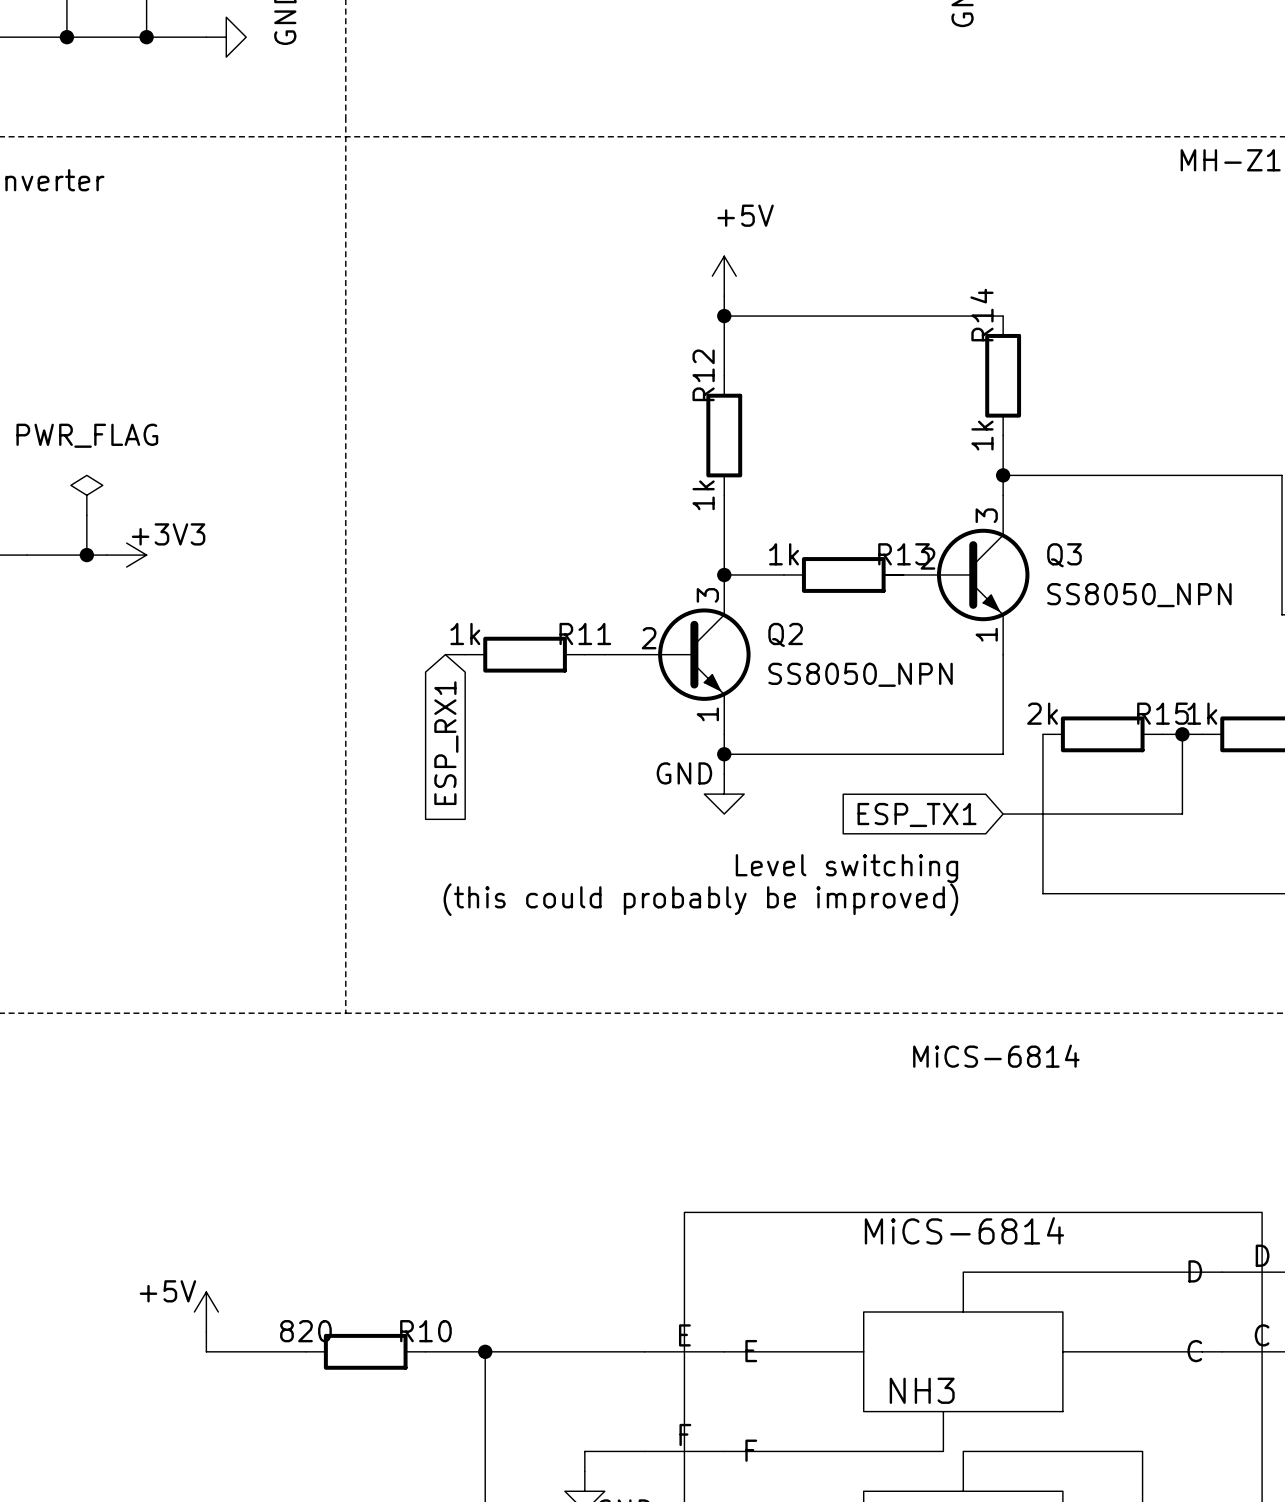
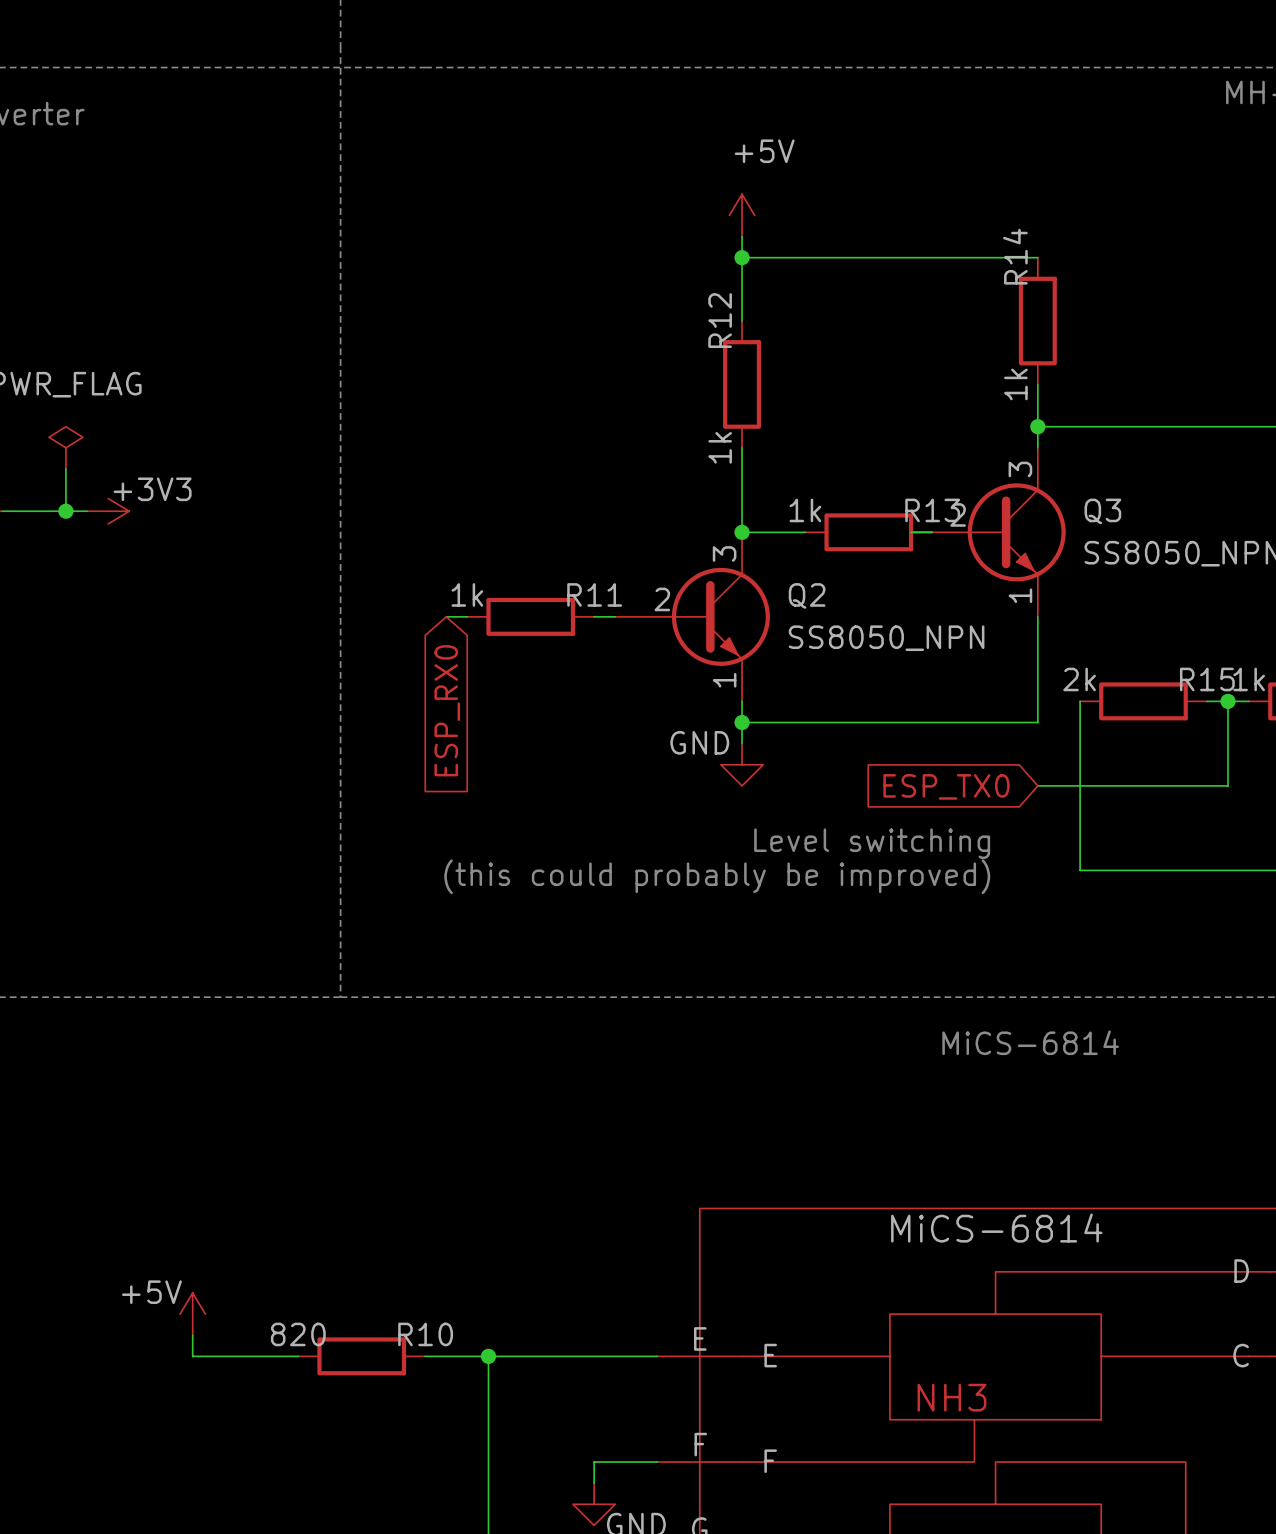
global label: ESP_RX1 (446, 743) -> ESP_RX0 (447, 710)
global label: ESP_TX1 (917, 814) -> ESP_TX0 (946, 786)

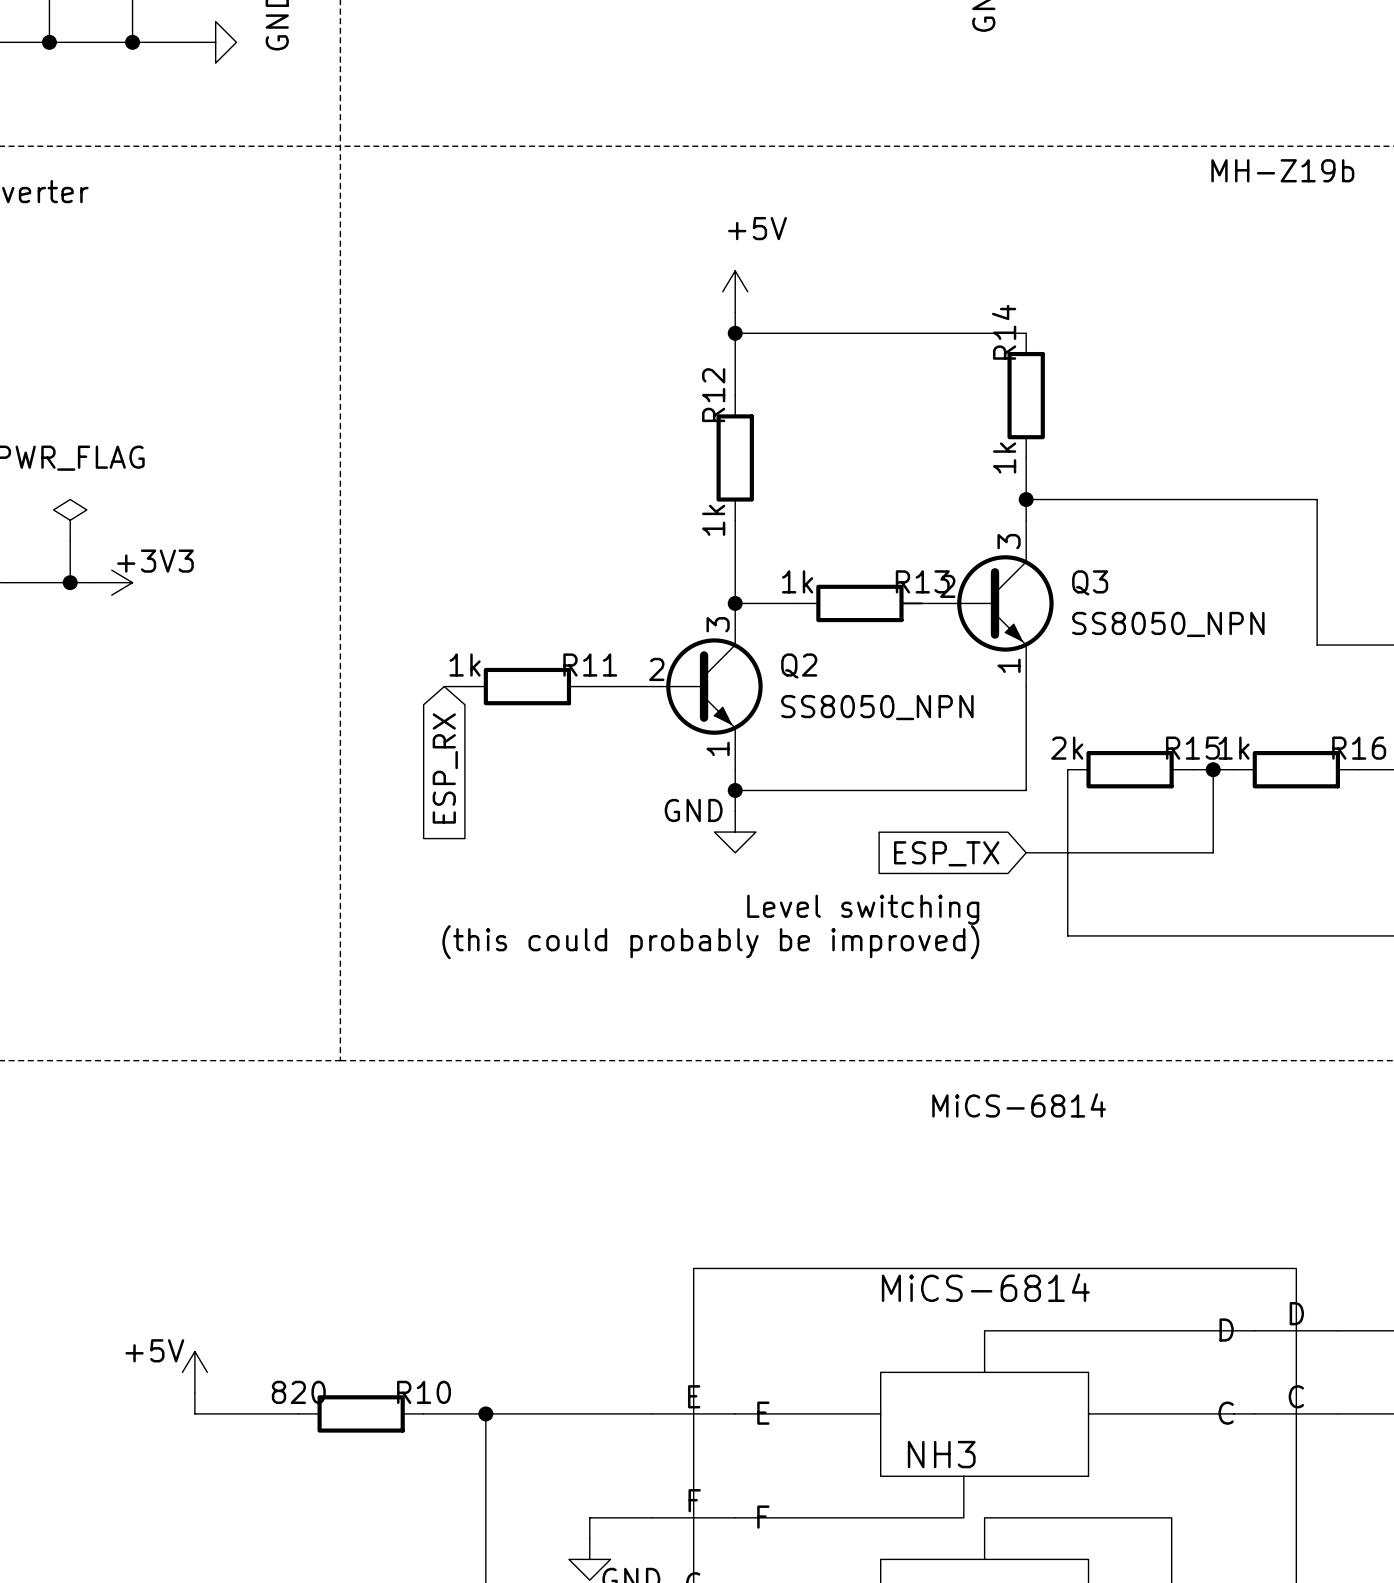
global label: ESP_RX0 (447, 710) -> ESP_RX (445, 768)
global label: ESP_TX0 (946, 786) -> ESP_TX (946, 853)

